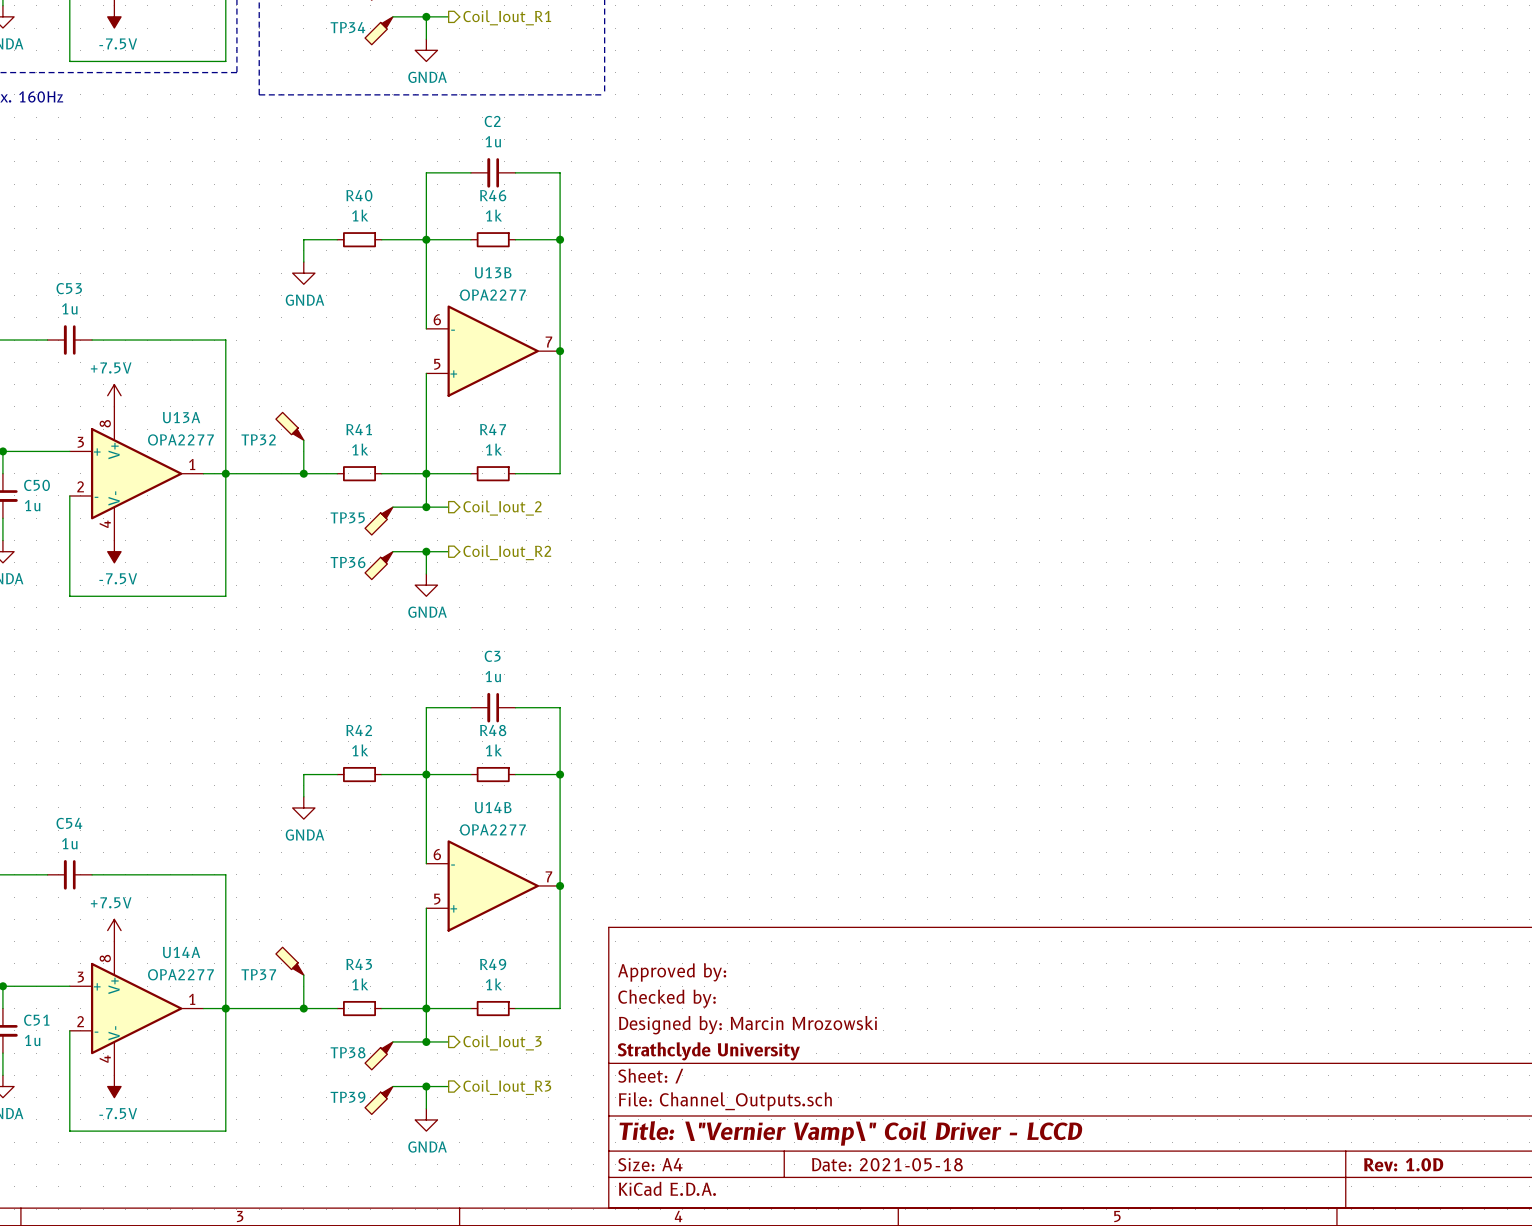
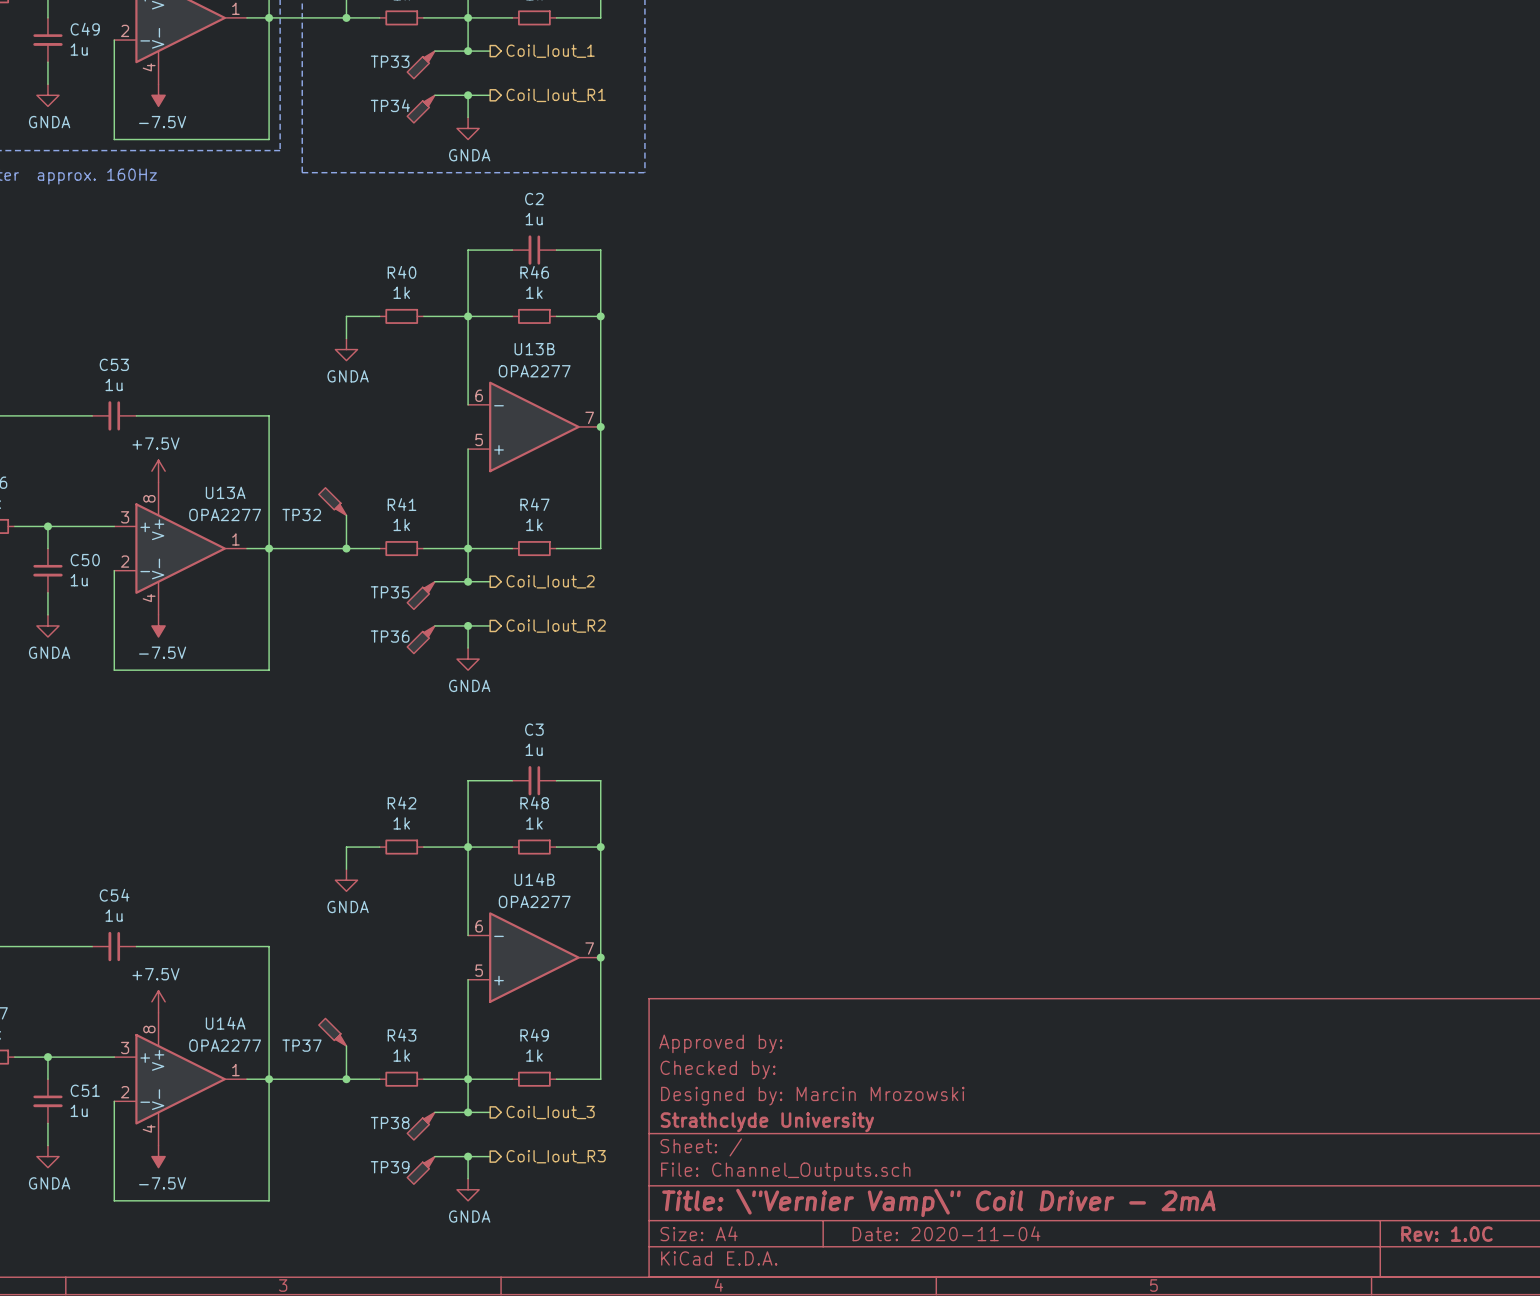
title block: Title: \"Vernier Vamp\" Coil Driver - LCCD (850, 1133) -> Title: \"Vernier Vamp\" Coil Driver - 2mA (938, 1202)
title block: Date: 2021-05-18 (887, 1164) -> Date: 2020-11-04 (946, 1233)
title block: Rev: 1.0D (1403, 1164) -> Rev: 1.0C (1446, 1234)

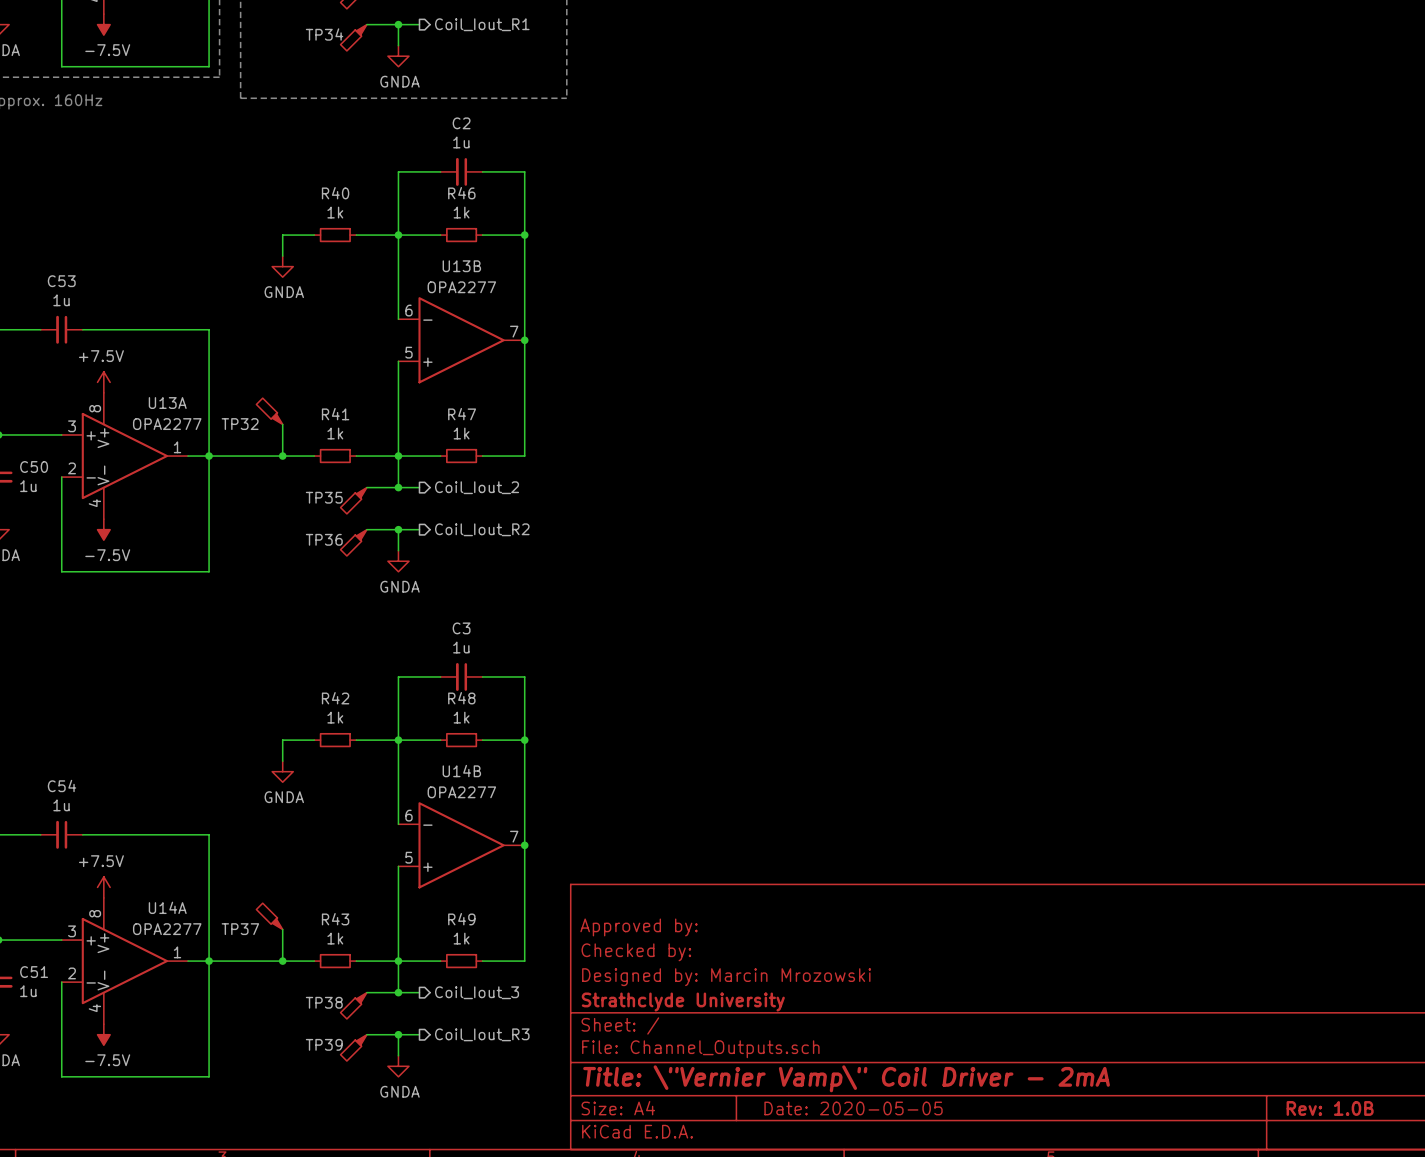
title block: Date: 2020-11-04 (946, 1233) -> Date: 2020-05-05 (853, 1108)
title block: Rev: 1.0C (1446, 1234) -> Rev: 1.0B (1330, 1108)

